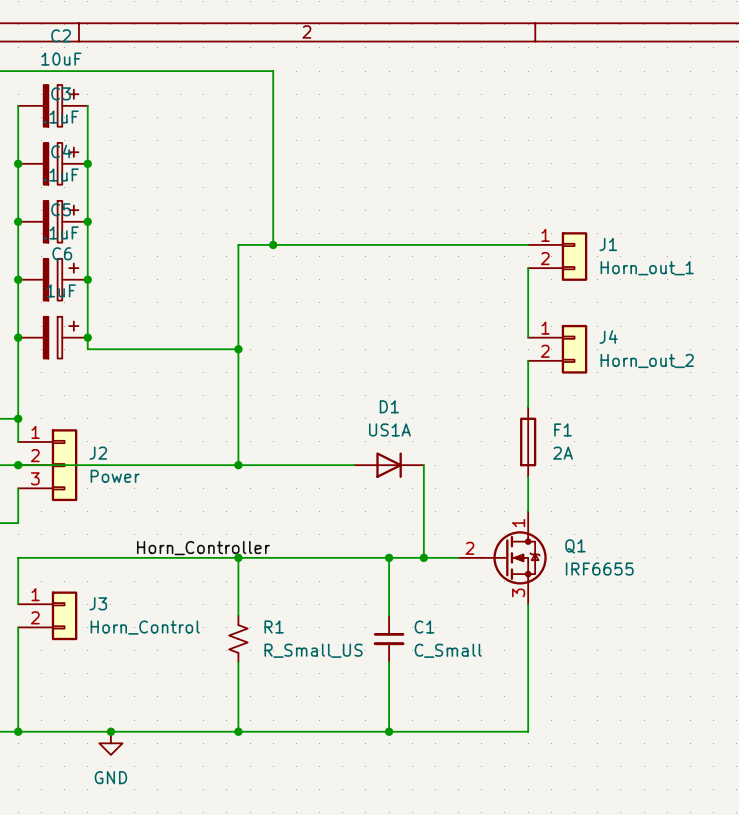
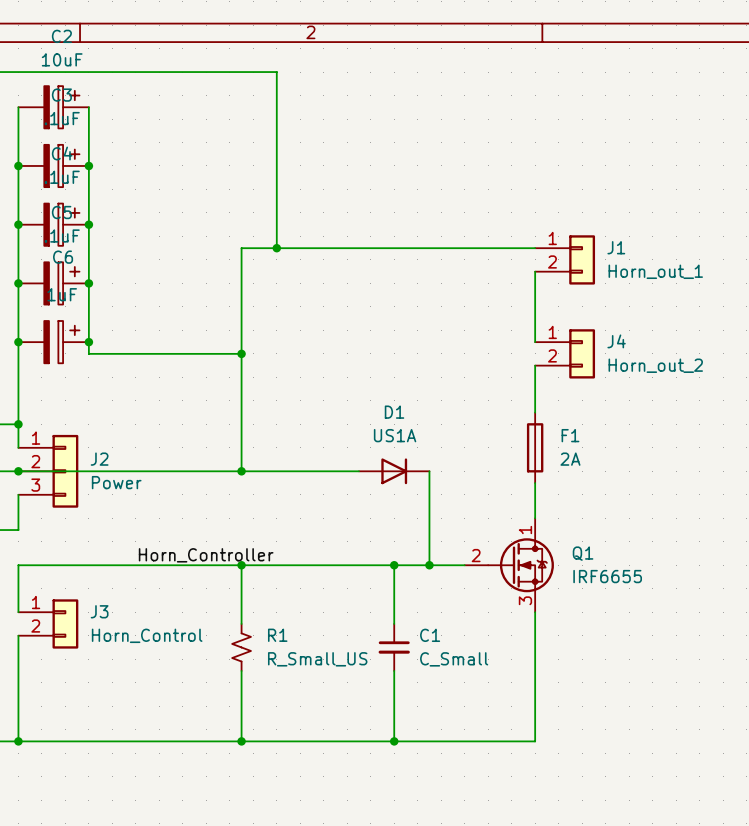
junction: (110, 731) -> none
power symbol: GND (110, 743) -> none

